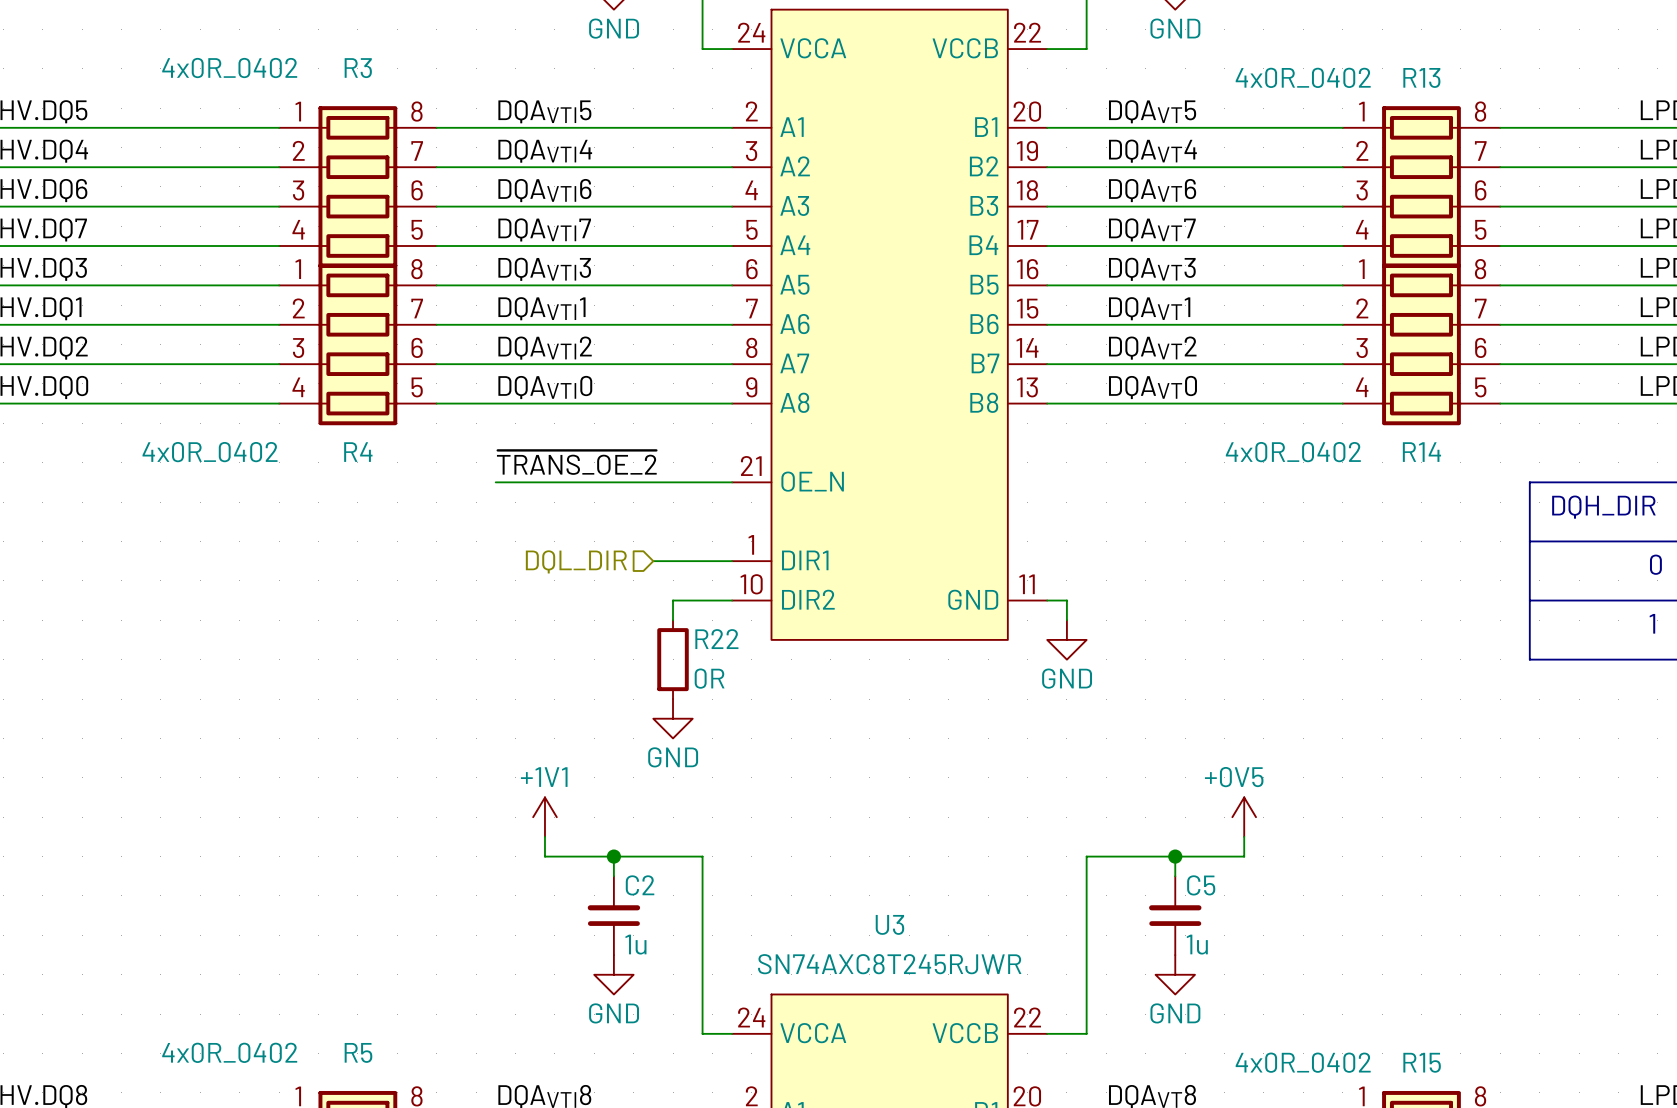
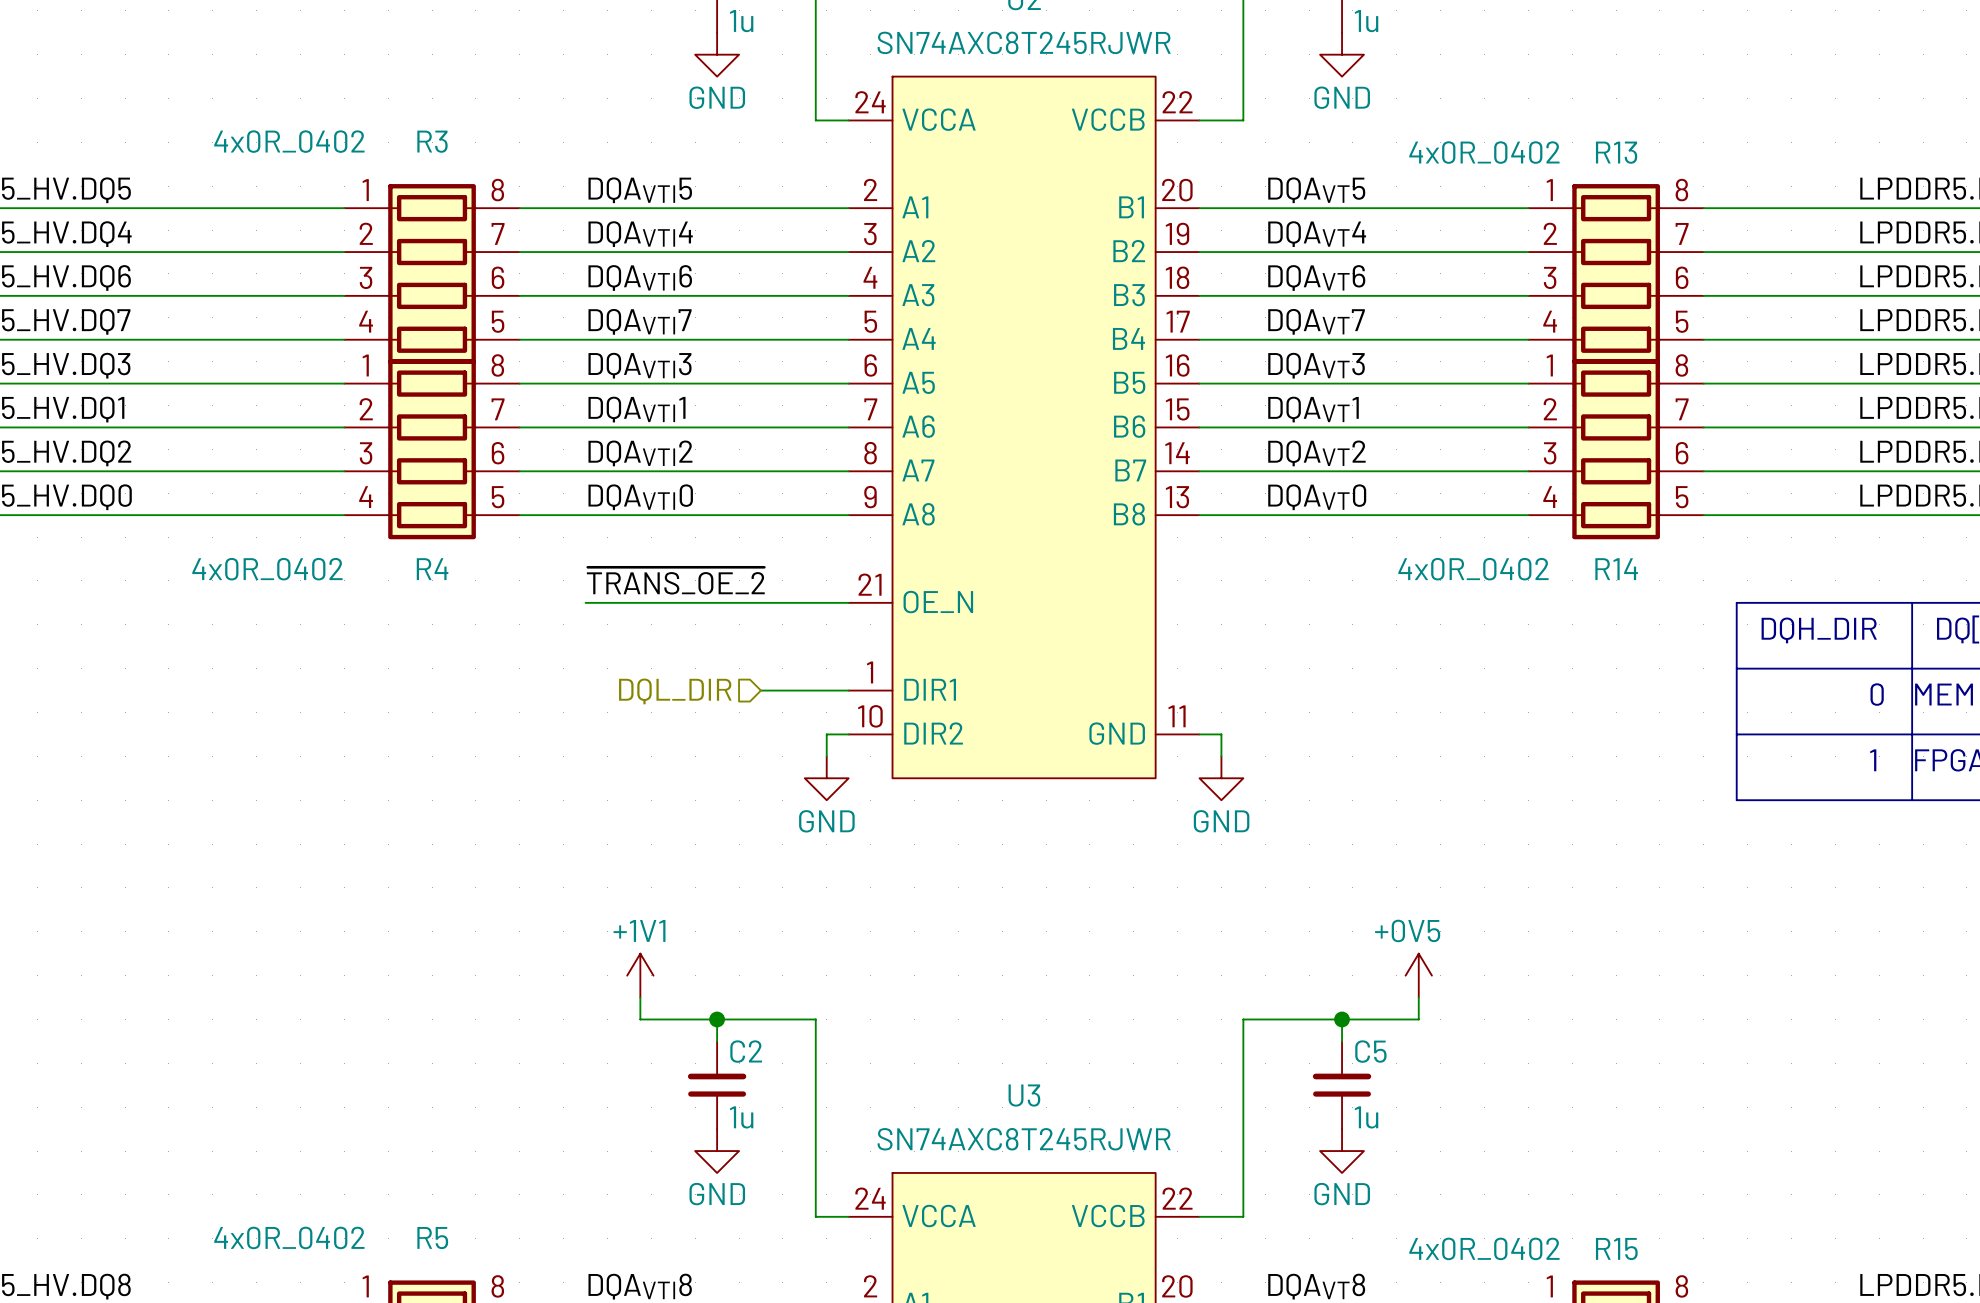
wire: (712, 600) (673, 600) (673, 620) -> (826, 734) (826, 756)
R22: (673, 659) -> none
power symbol position: GND (673, 718) -> GND (826, 778)

